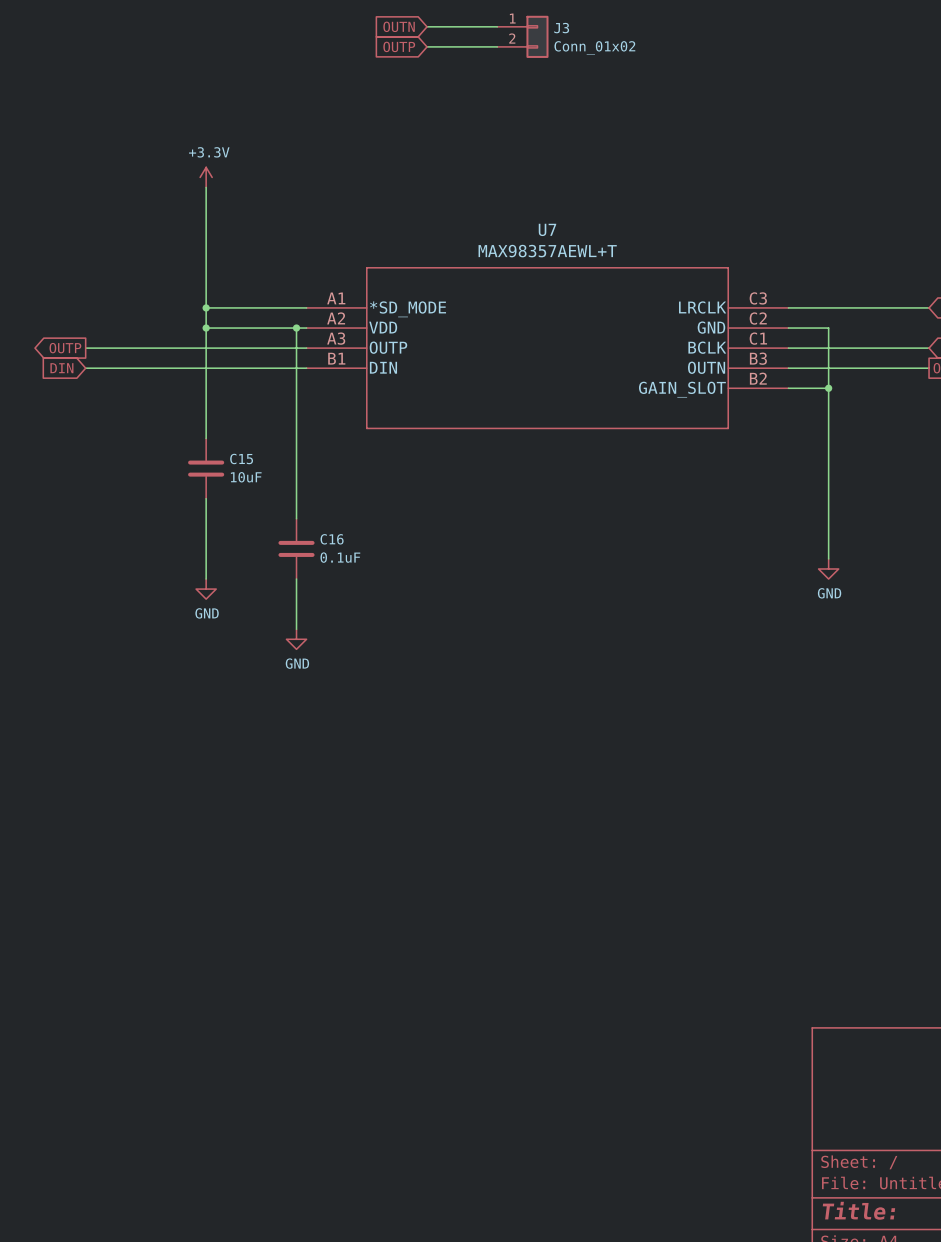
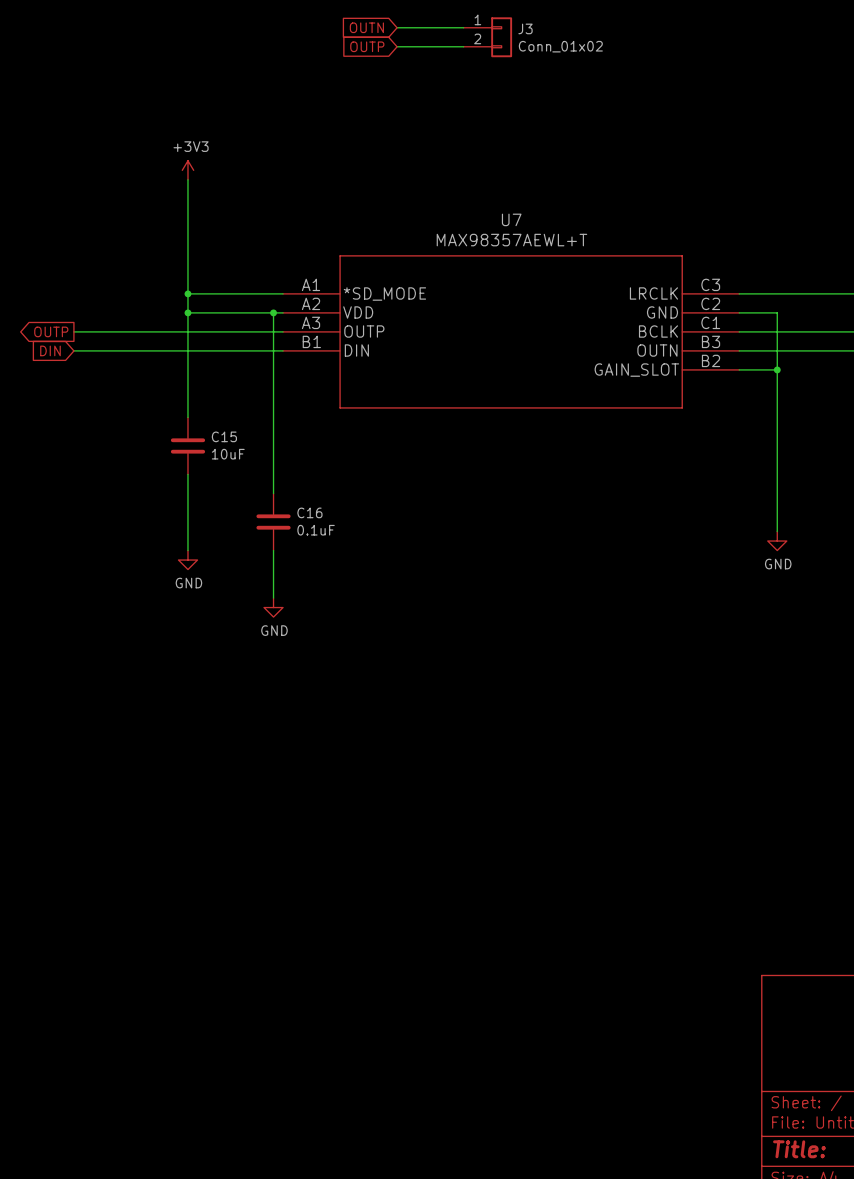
power symbol: +3.3V (206, 177) -> +3V3 (187, 170)

